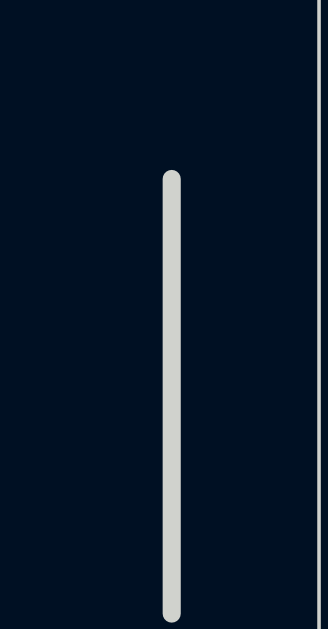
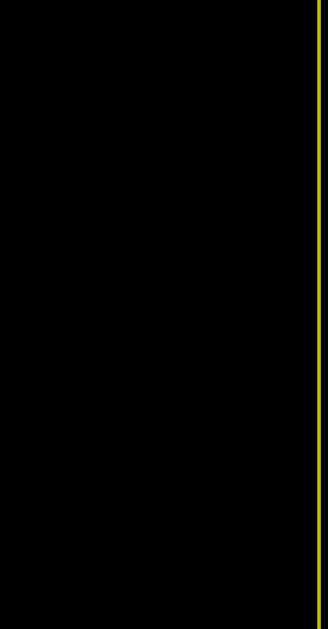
part: (171, 396) -> none

